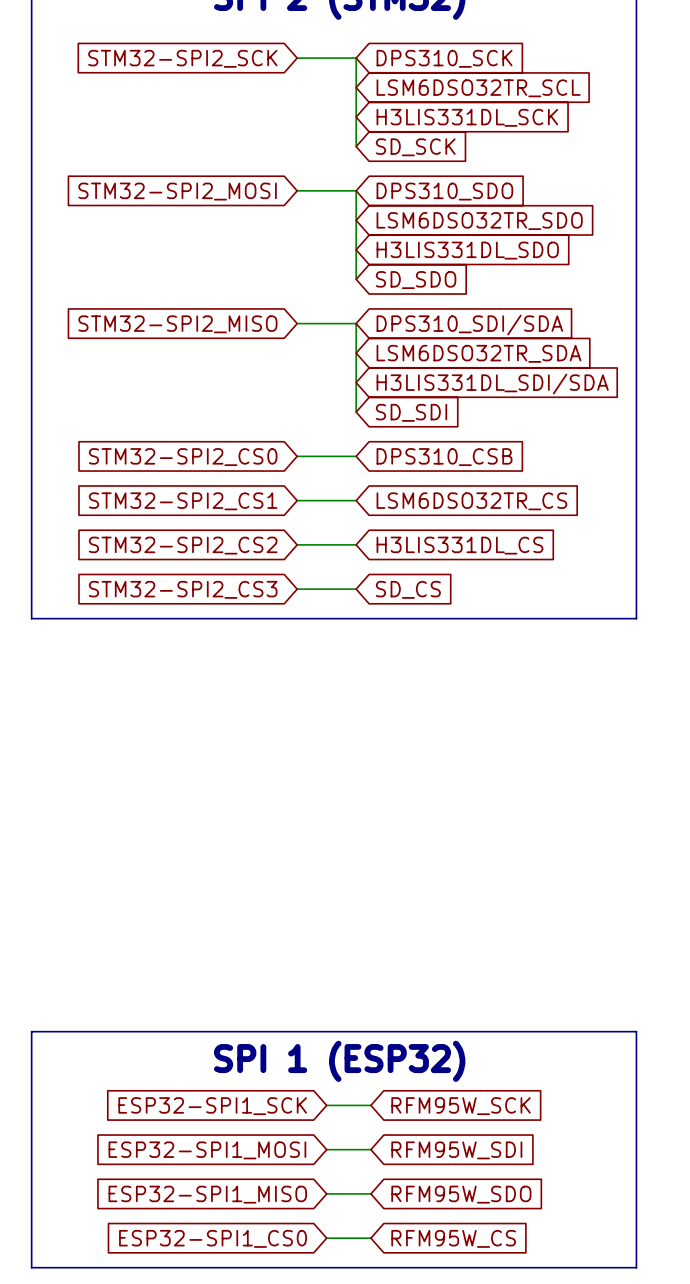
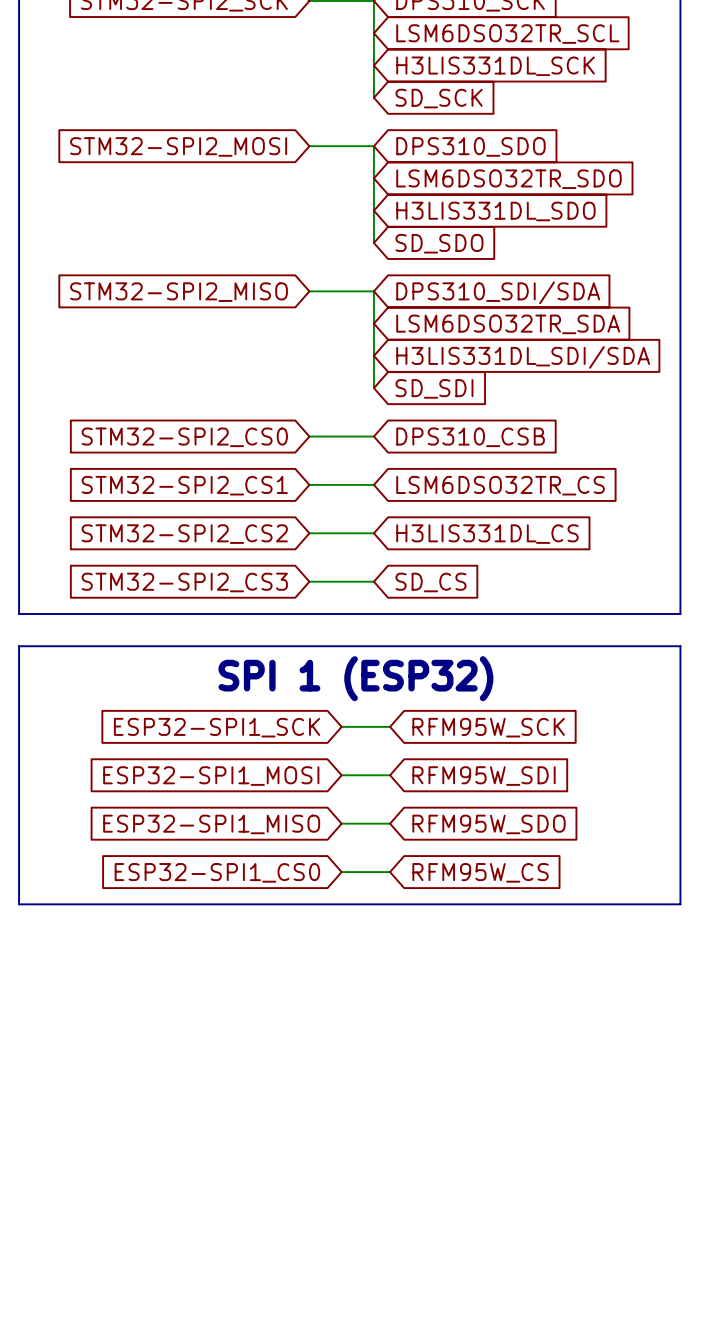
line: none -> (19, 646) (680, 646) (680, 904) (19, 904) (19, 646)
text: none -> SPI 1 (ESP32) (355, 678)
wire: none -> (341, 726) (390, 726)
global label: none -> ESP32-SPI1_SCK (217, 727)
global label: none -> RFM95W_SCK (488, 727)
global label: none -> ESP32-SPI1_MOSI (211, 776)
wire: none -> (341, 775) (390, 775)
global label: none -> RFM95W_SDI (484, 776)
wire: none -> (341, 823) (390, 823)
global label: none -> ESP32-SPI1_MISO (211, 824)
global label: none -> RFM95W_SDO (489, 824)
global label: none -> ESP32-SPI1_CS0 (217, 872)
global label: none -> RFM95W_CS (480, 872)
line: (31, 1031) (636, 1031) (636, 1267) (31, 1267) (31, 1031) -> none
text: SPI 1 (ESP32) (339, 1061) -> none
wire: (326, 1105) (370, 1105) -> (341, 872) (390, 872)
global label: ESP32-SPI1_SCK (212, 1106) -> none
global label: RFM95W_SCK (461, 1106) -> none
wire: (326, 1149) (370, 1149) -> none
global label: ESP32-SPI1_MOSI (207, 1150) -> none
global label: RFM95W_SDI (456, 1150) -> none
wire: (326, 1193) (370, 1193) -> none
global label: ESP32-SPI1_MISO (207, 1194) -> none
global label: RFM95W_SDO (461, 1194) -> none
global label: ESP32-SPI1_CS0 (213, 1238) -> none
wire: (326, 1238) (370, 1238) -> none
global label: RFM95W_CS (453, 1238) -> none

